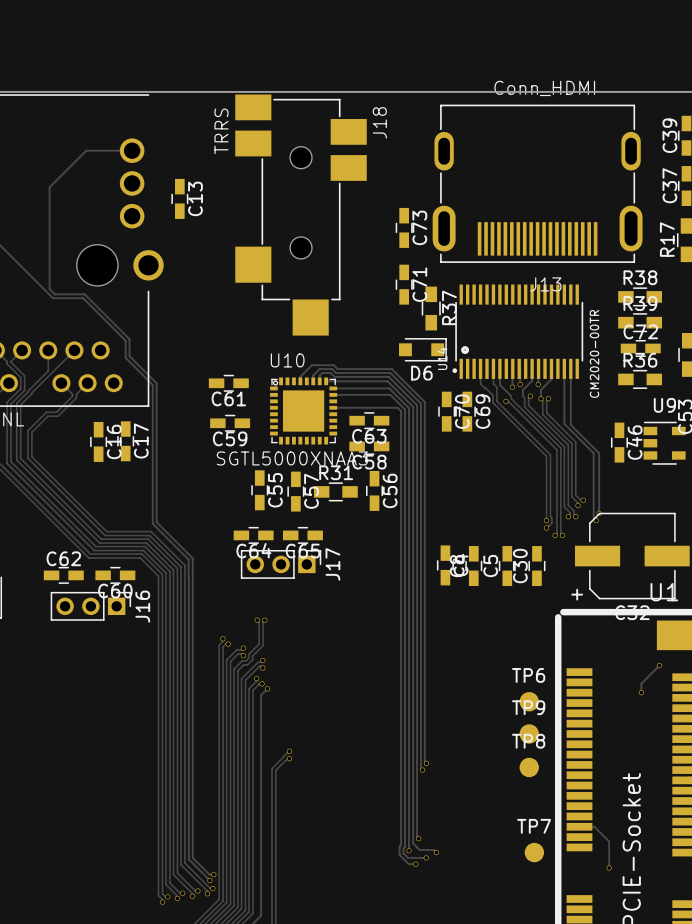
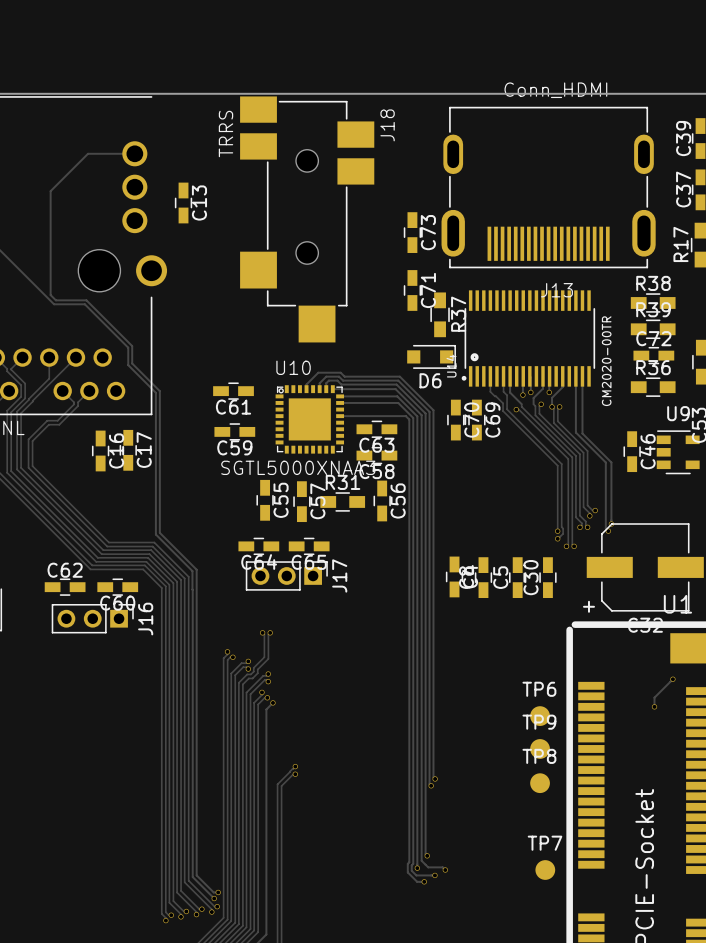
track: (579, 826) (594, 826) (609, 841) (609, 868) -> none
via: (609, 868) -> none

